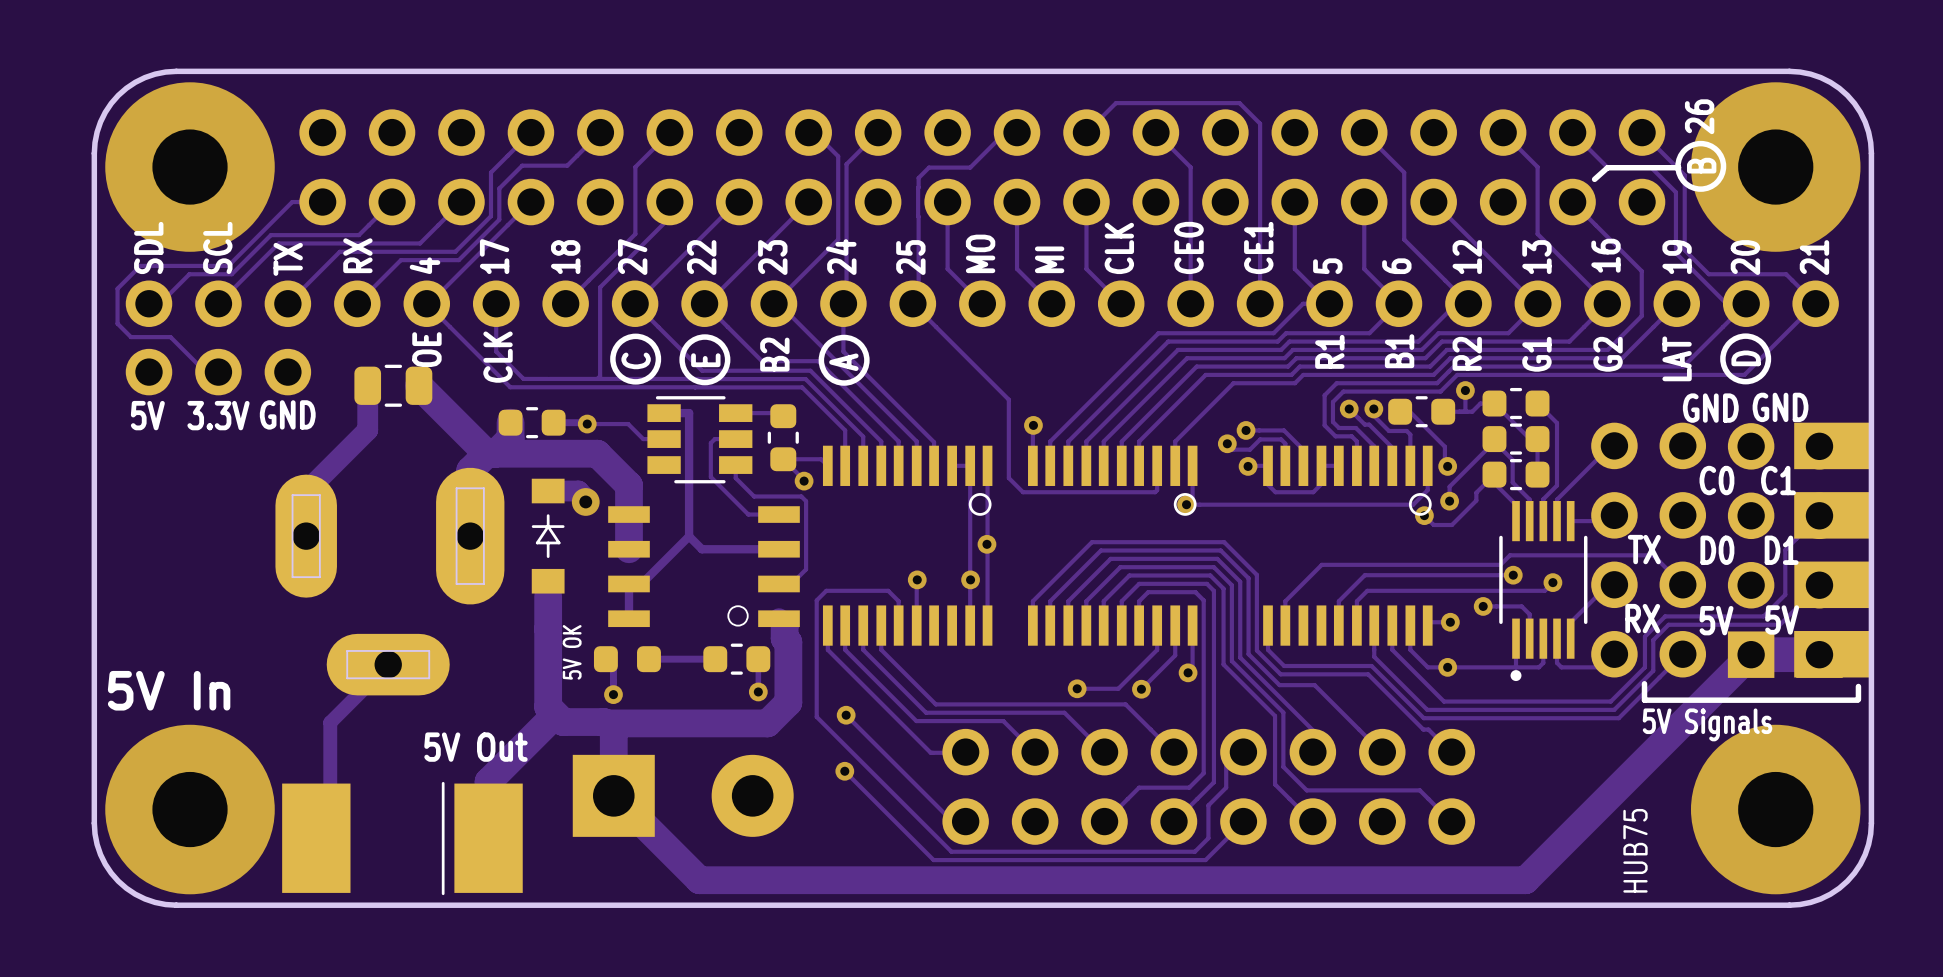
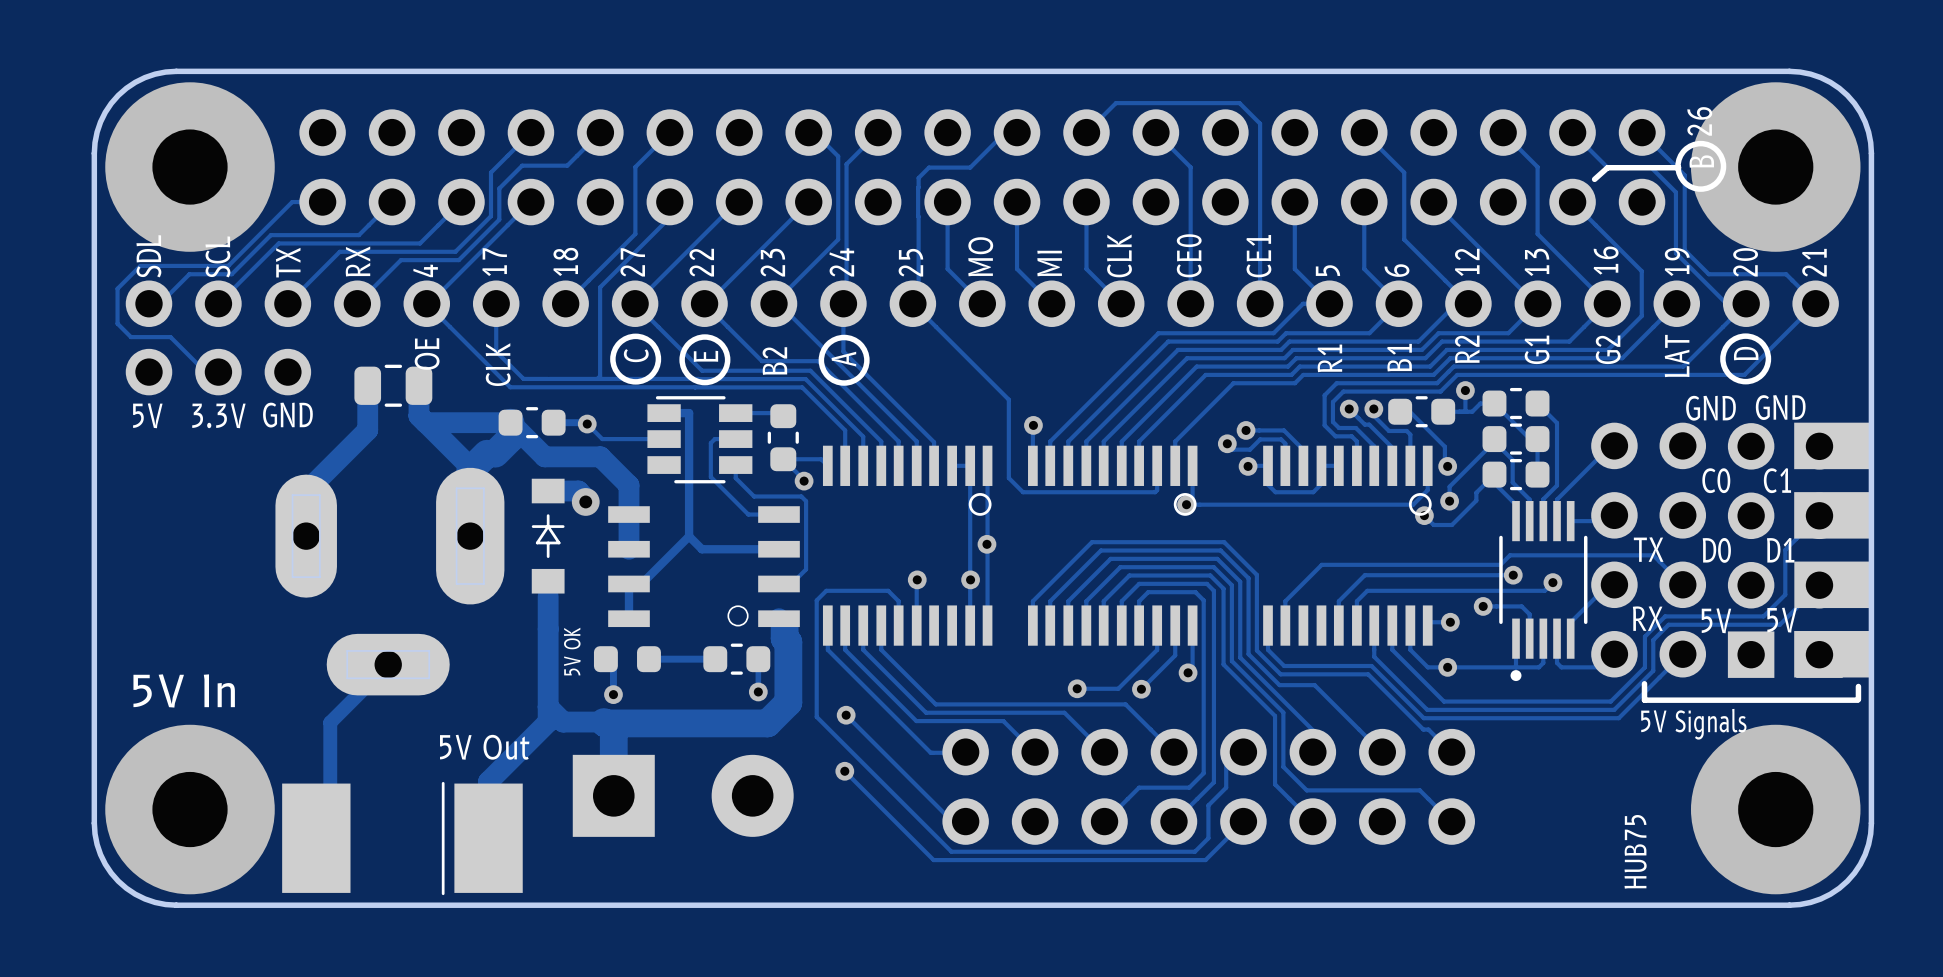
track: (418, 385) (486, 453) (597, 453) (600, 456) -> (425, 422) (510, 422) (544, 456) (600, 456)
track: none -> (418, 385) (418, 415) (470, 467) (470, 470)
track: (587, 424) (628, 424) (643, 439) -> (587, 424) (602, 439) (643, 439)
track width: thick (600, 456) (629, 485) (629, 549) -> thin (600, 456) (629, 485) (629, 549)
track width: thick (548, 596) (548, 707) (563, 722) (603, 722) -> thin (548, 596) (548, 707) (563, 722) (603, 722)
track: (1819, 654) (1751, 654) (1525, 880) (699, 880) (613, 795) -> none
track width: thick (548, 722) (488, 781) (488, 838) -> thin (548, 722) (488, 781) (488, 838)

